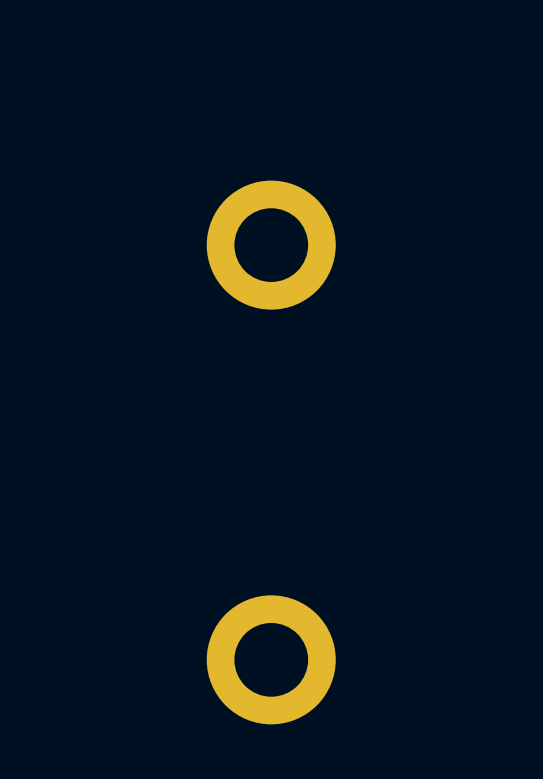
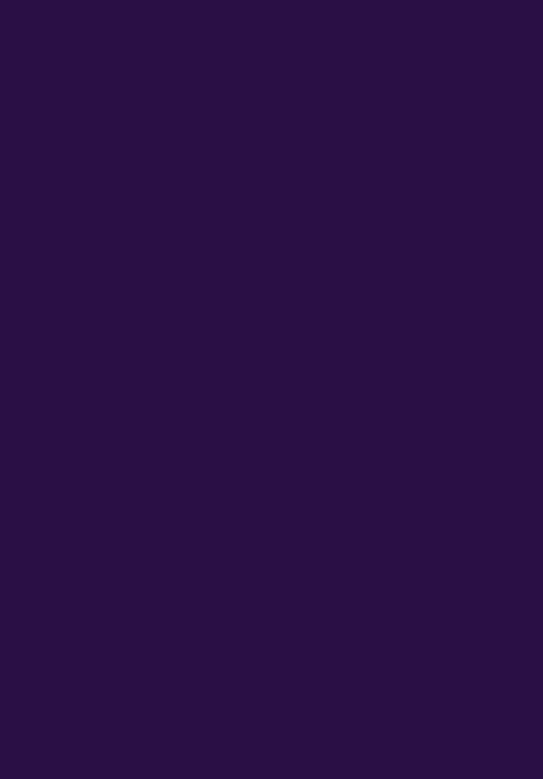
part: (271, 245) -> none
part: (271, 659) -> none

